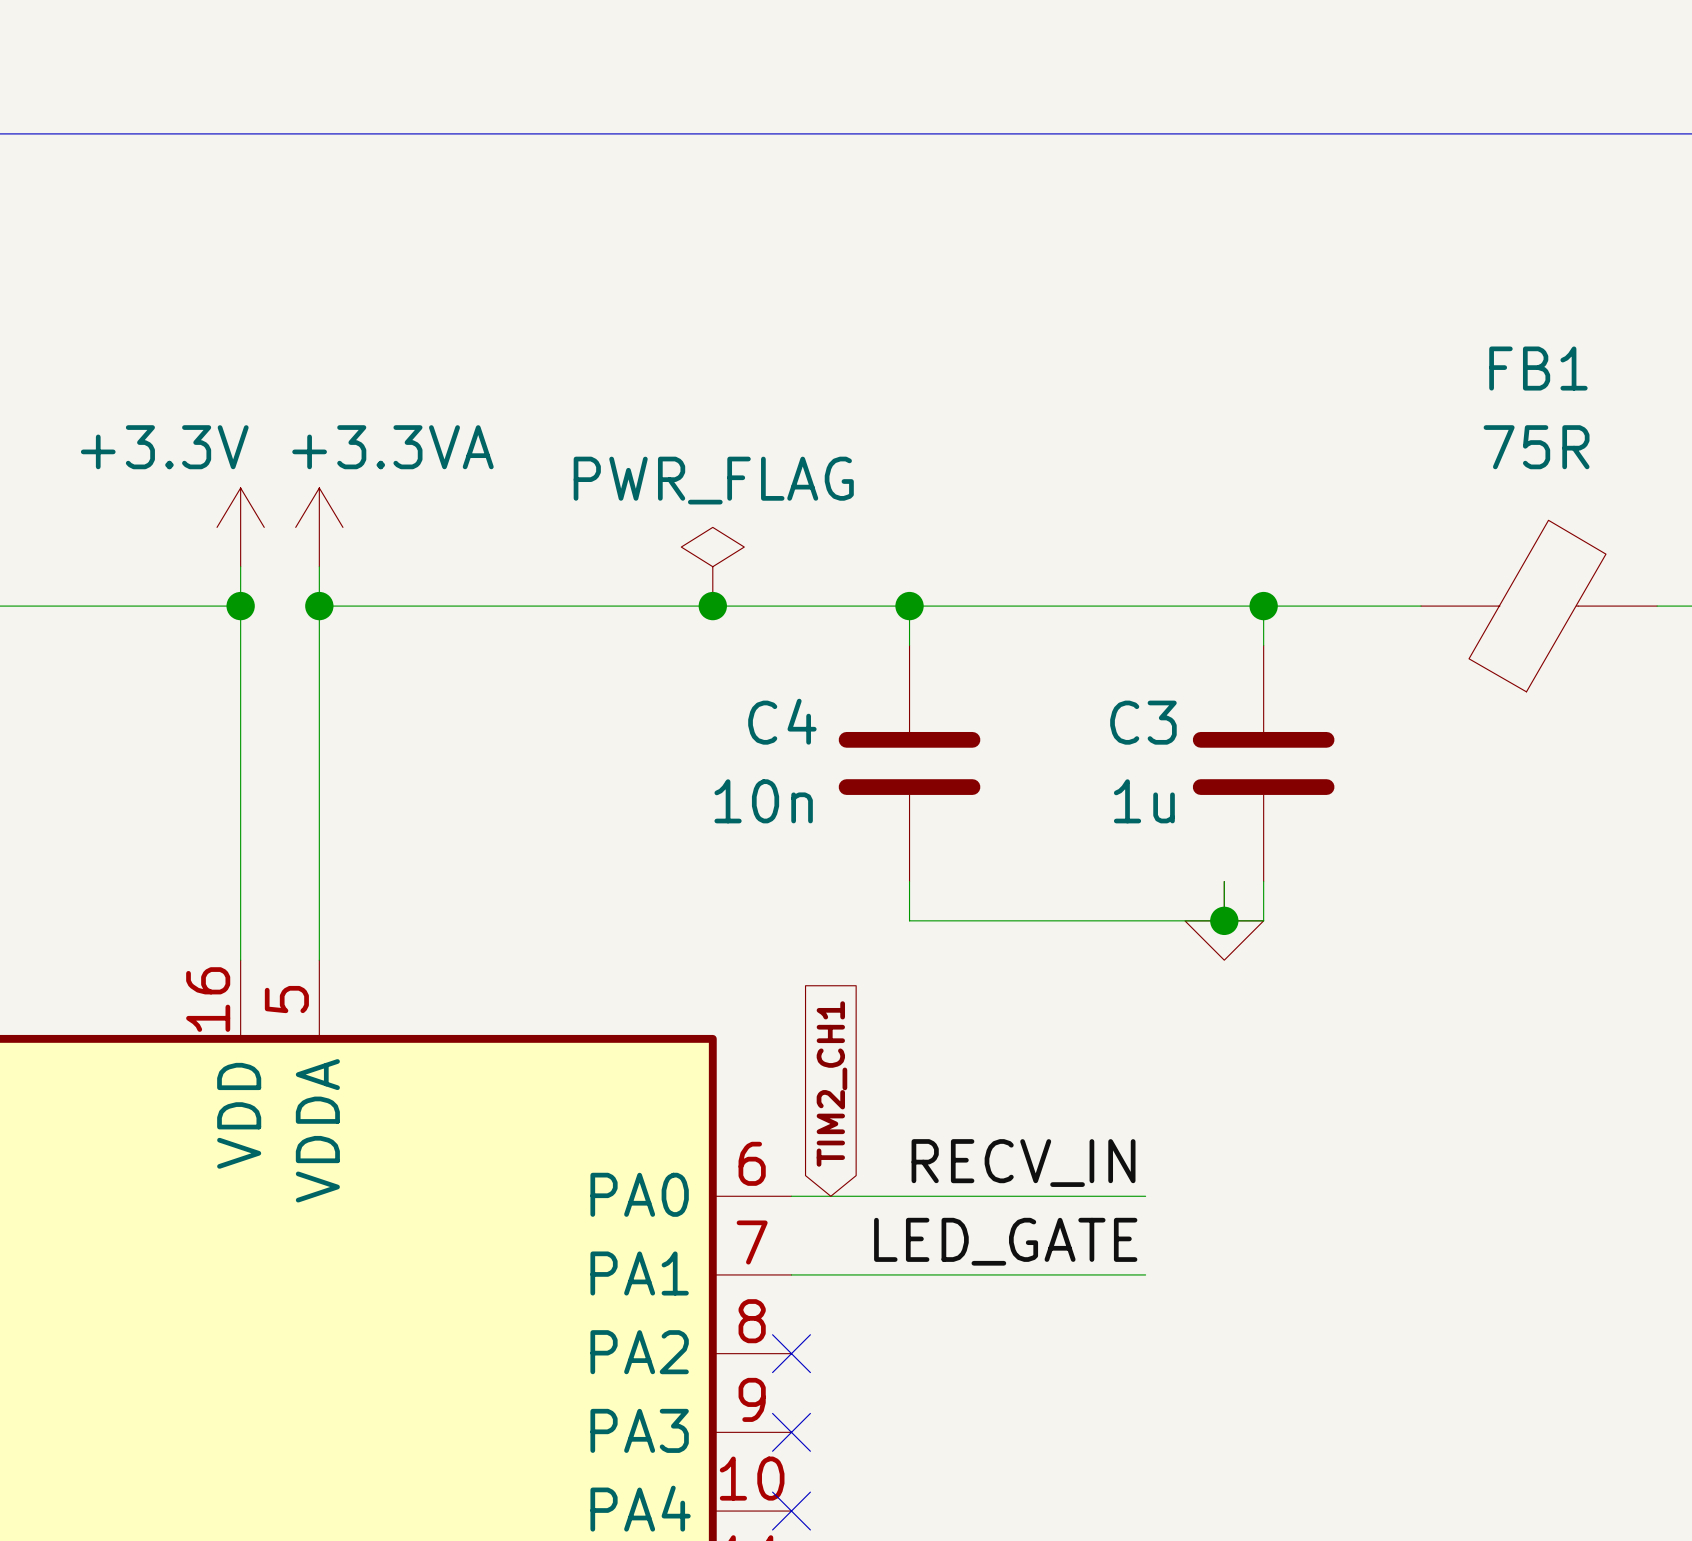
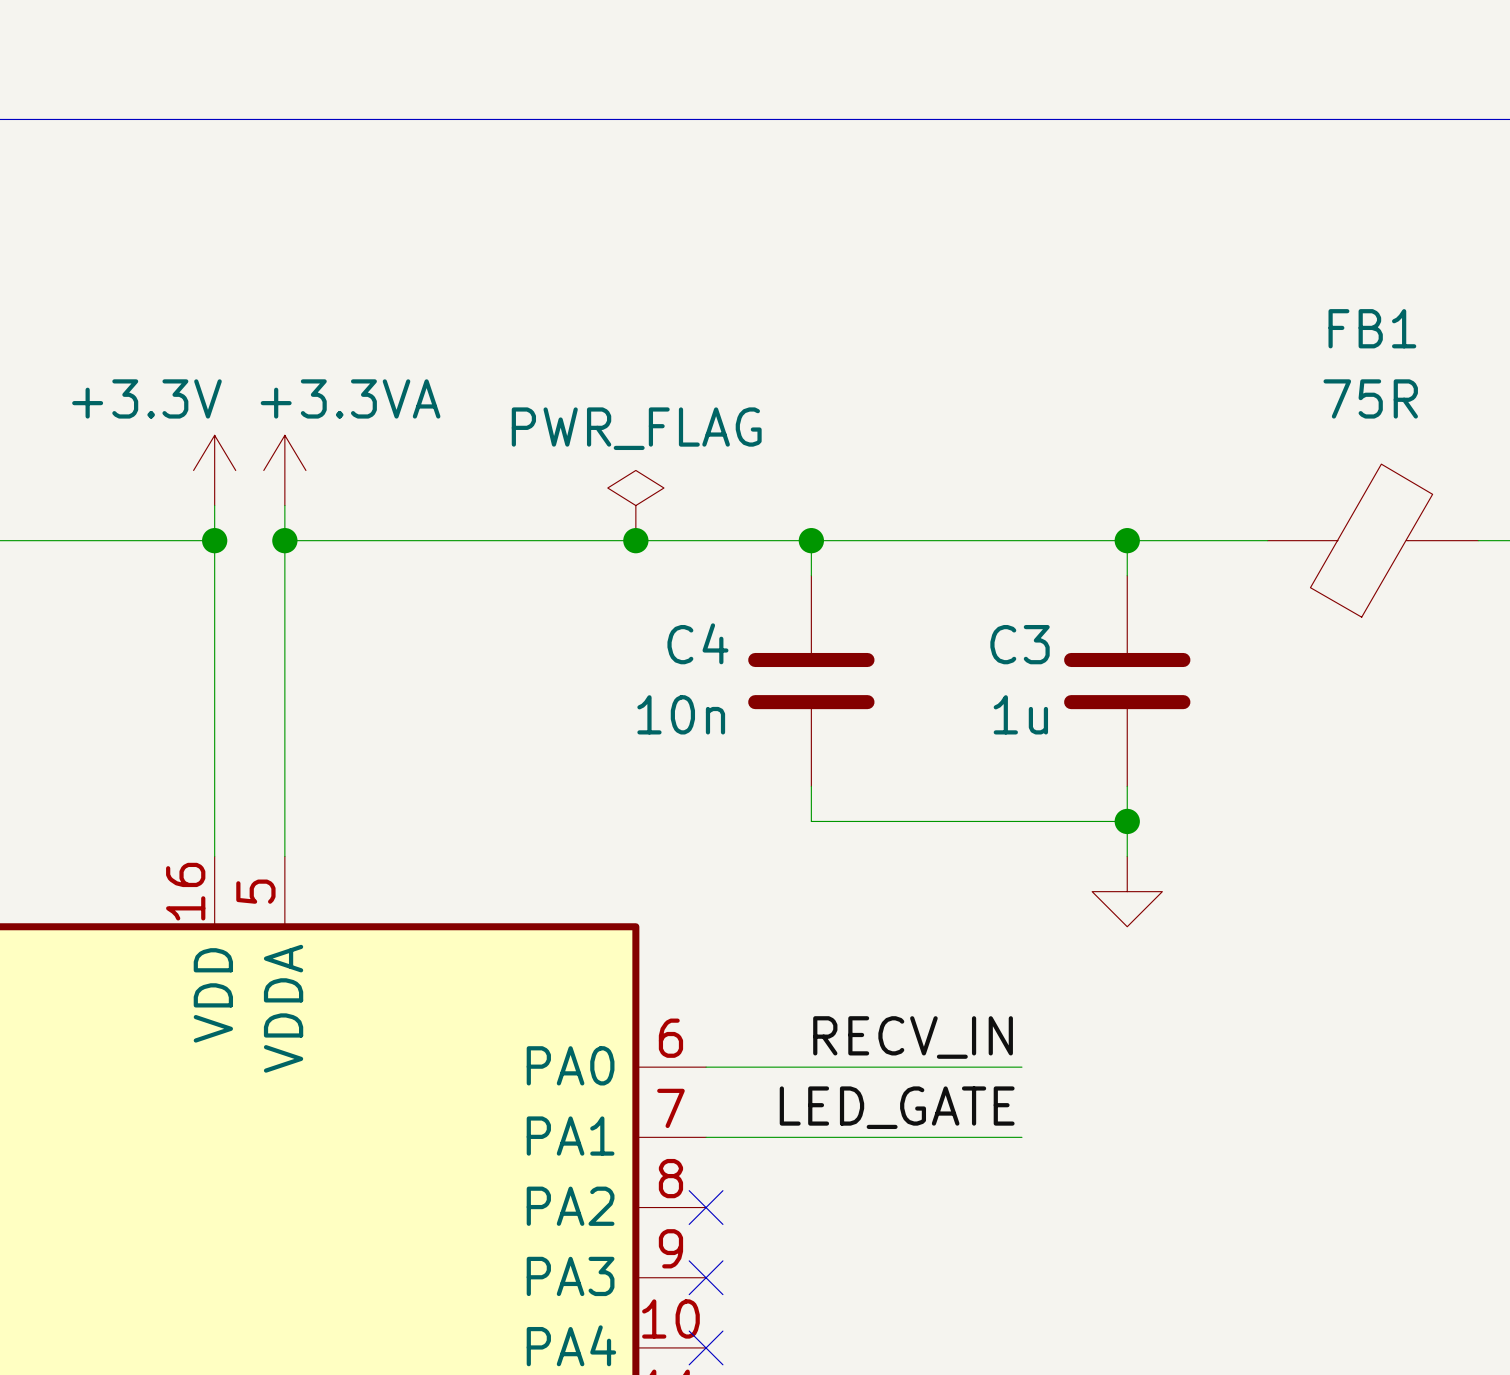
wire: (1224, 881) (1224, 920) -> (1127, 821) (1127, 856)
junction position: (1224, 920) -> (1127, 821)
power symbol position: (1224, 920) -> (1127, 891)
global label: TIM2_CH1 (831, 1083) -> none

